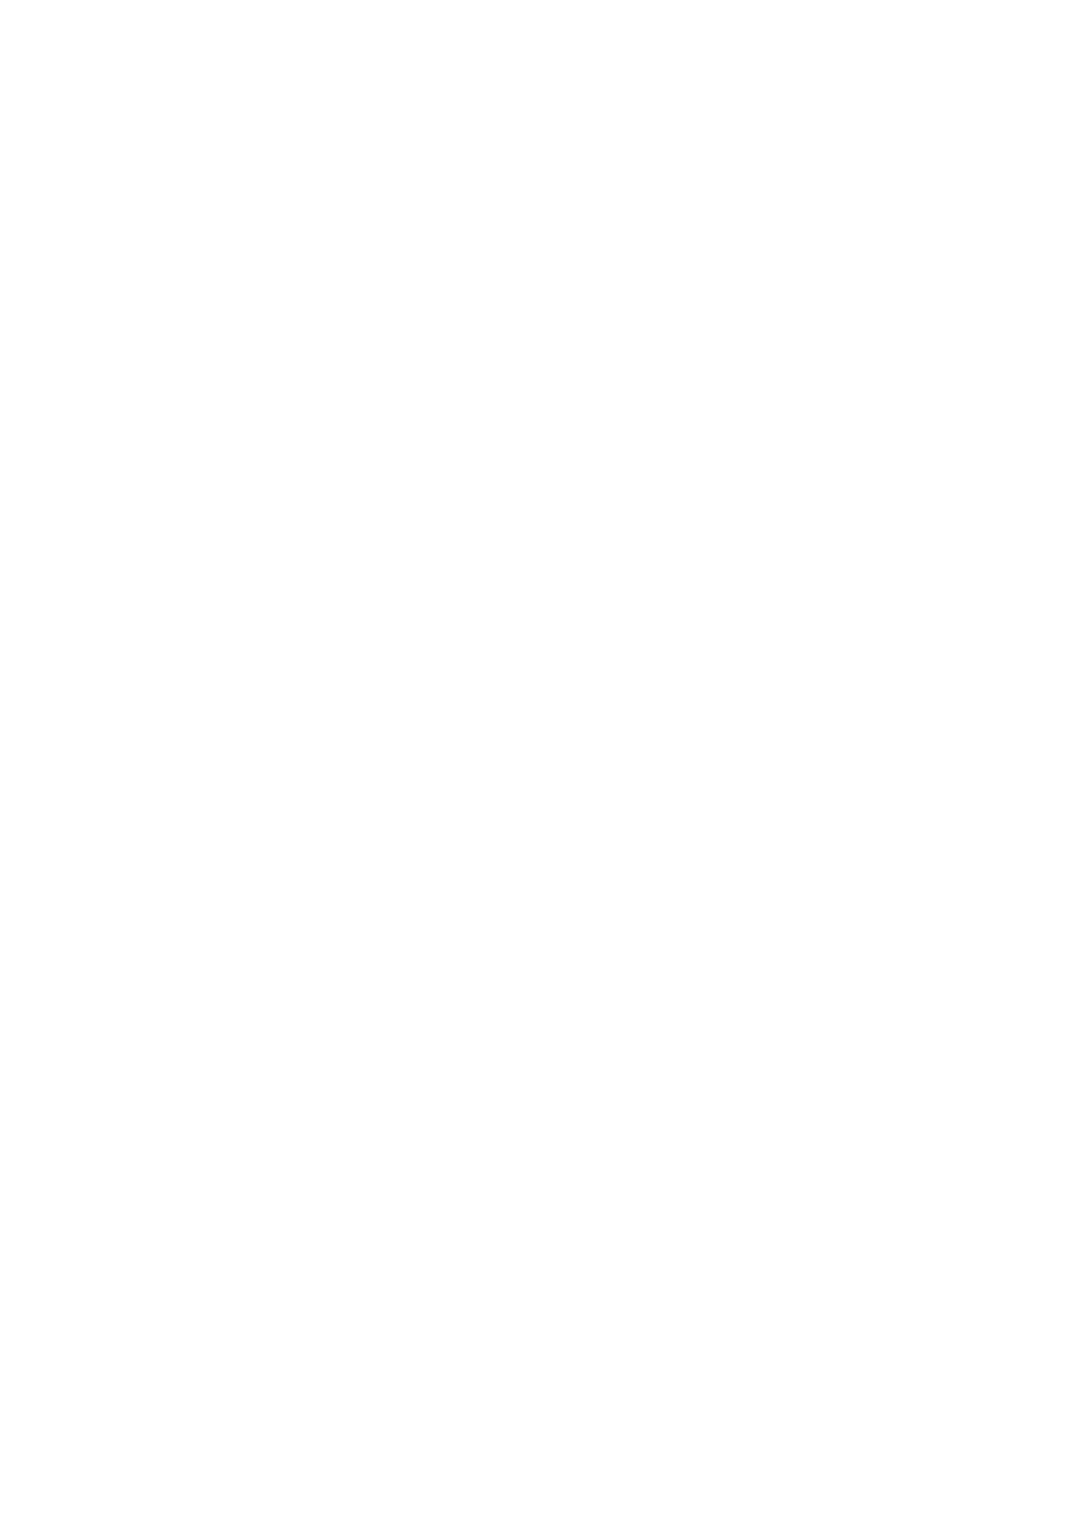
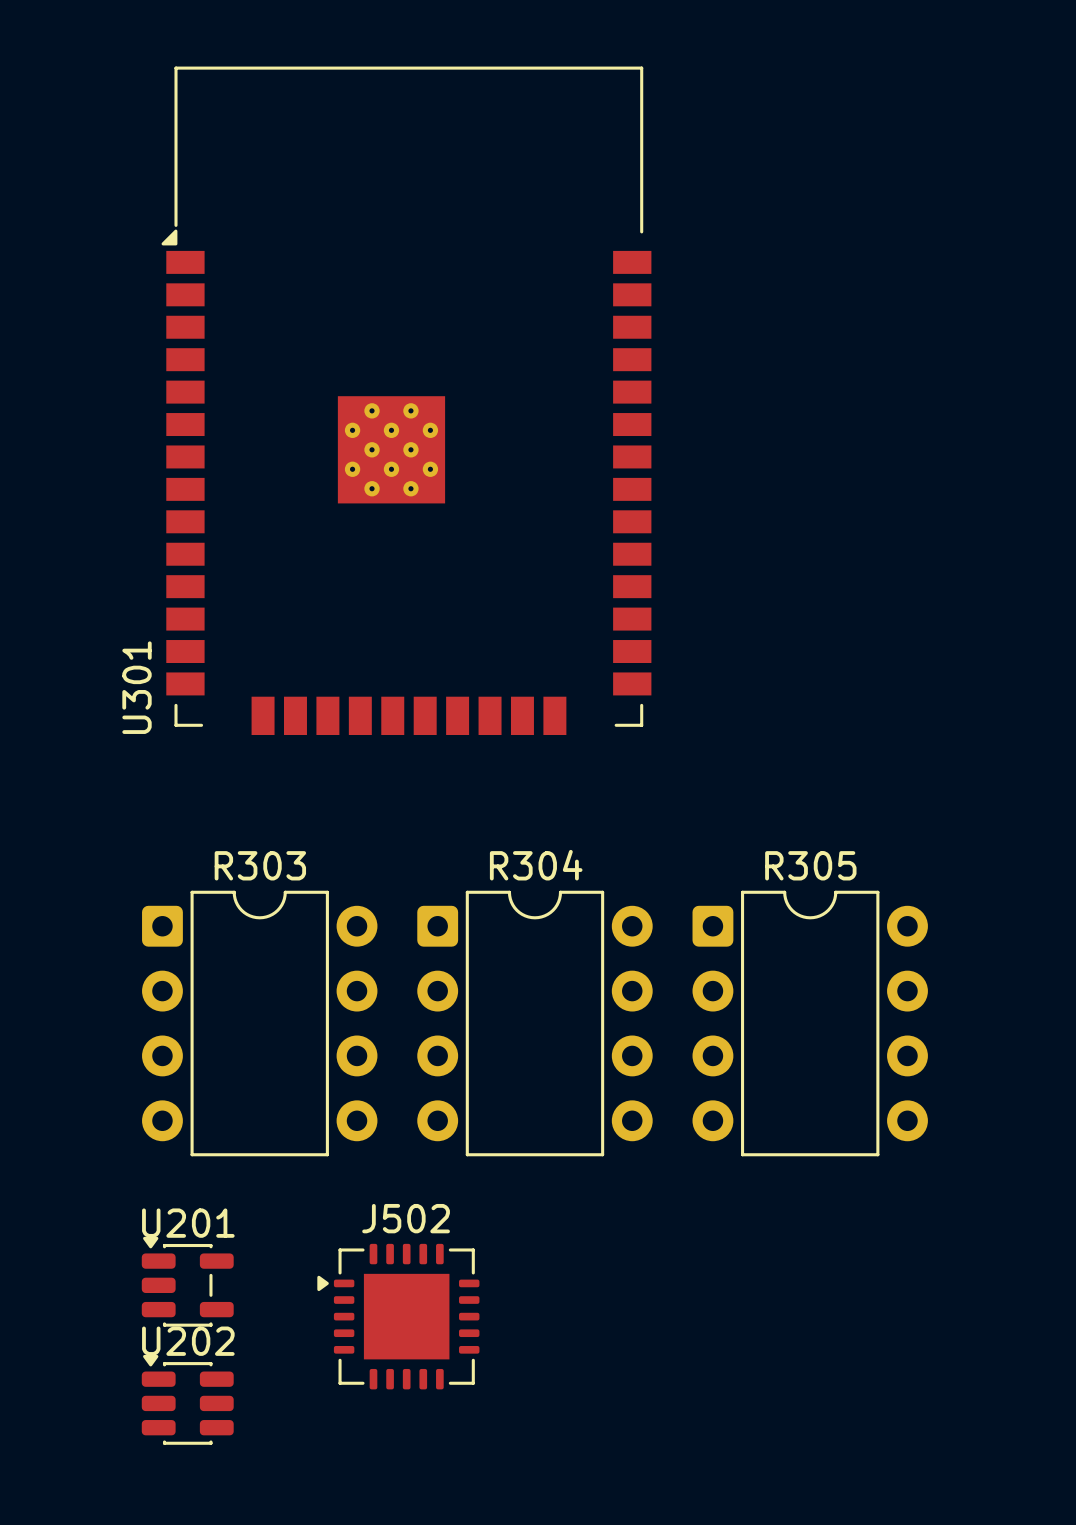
U301: none -> (406, 400)
R303: none -> (259, 1023)
R304: none -> (534, 1023)
R305: none -> (810, 1023)
U201: none -> (187, 1281)
J502: none -> (398, 1316)
U202: none -> (187, 1399)

